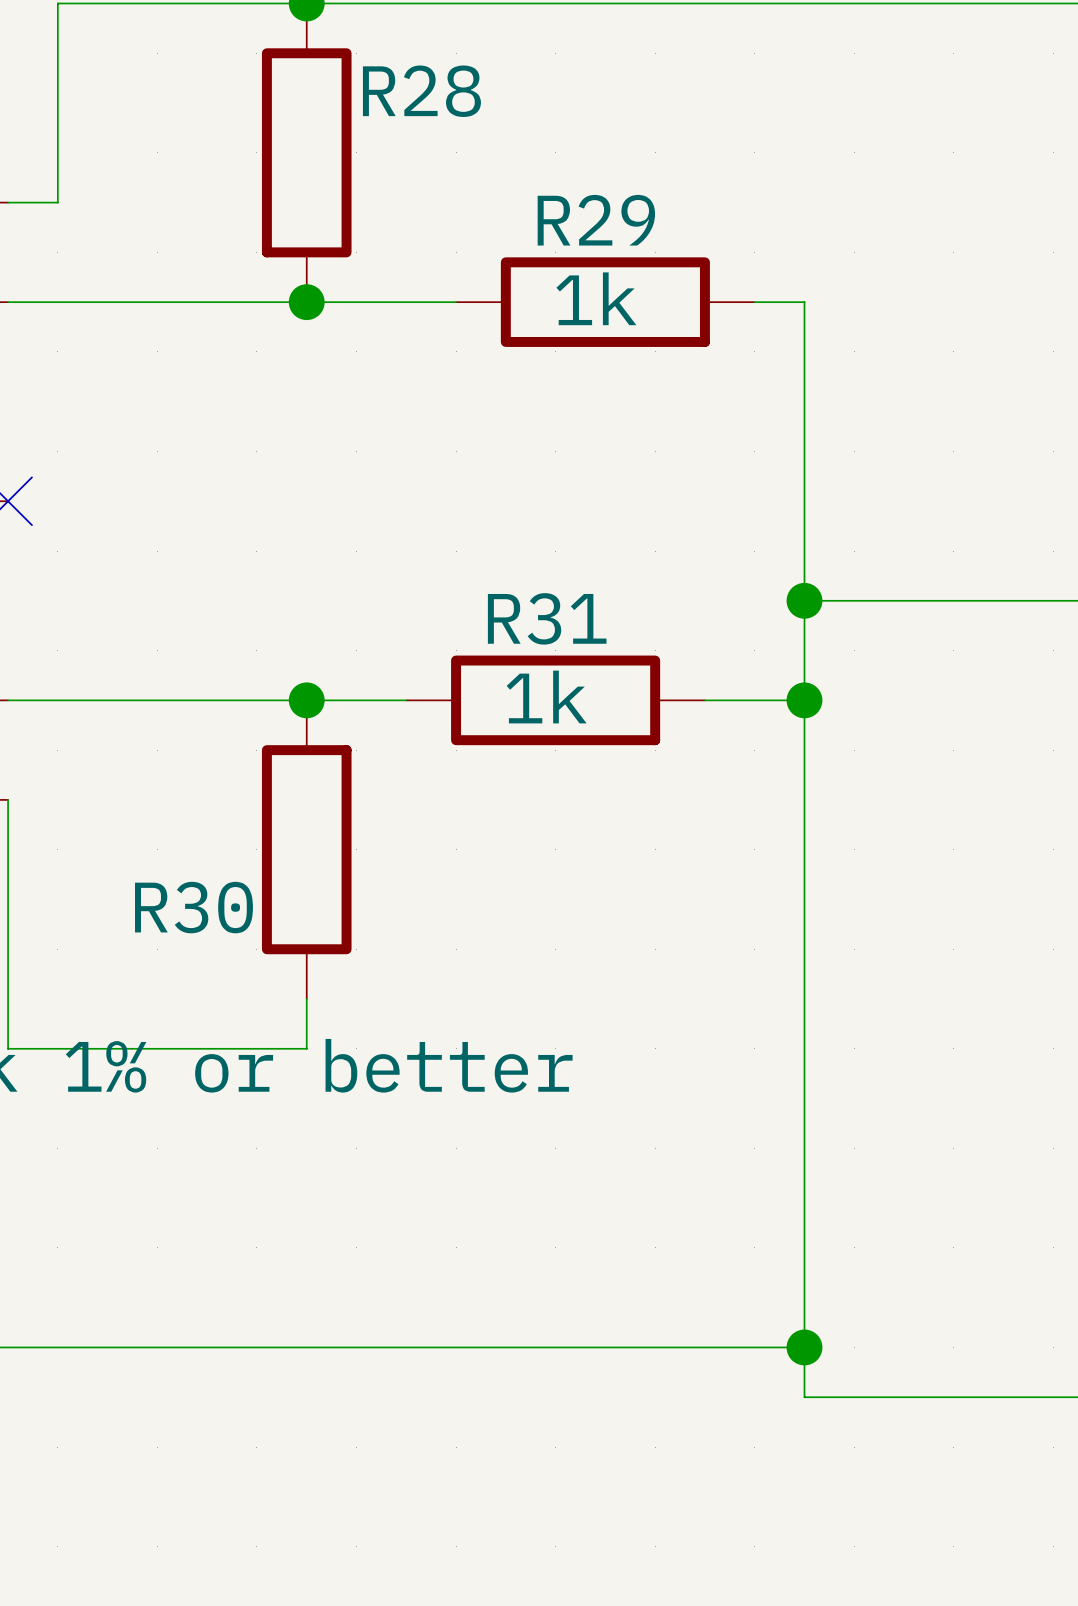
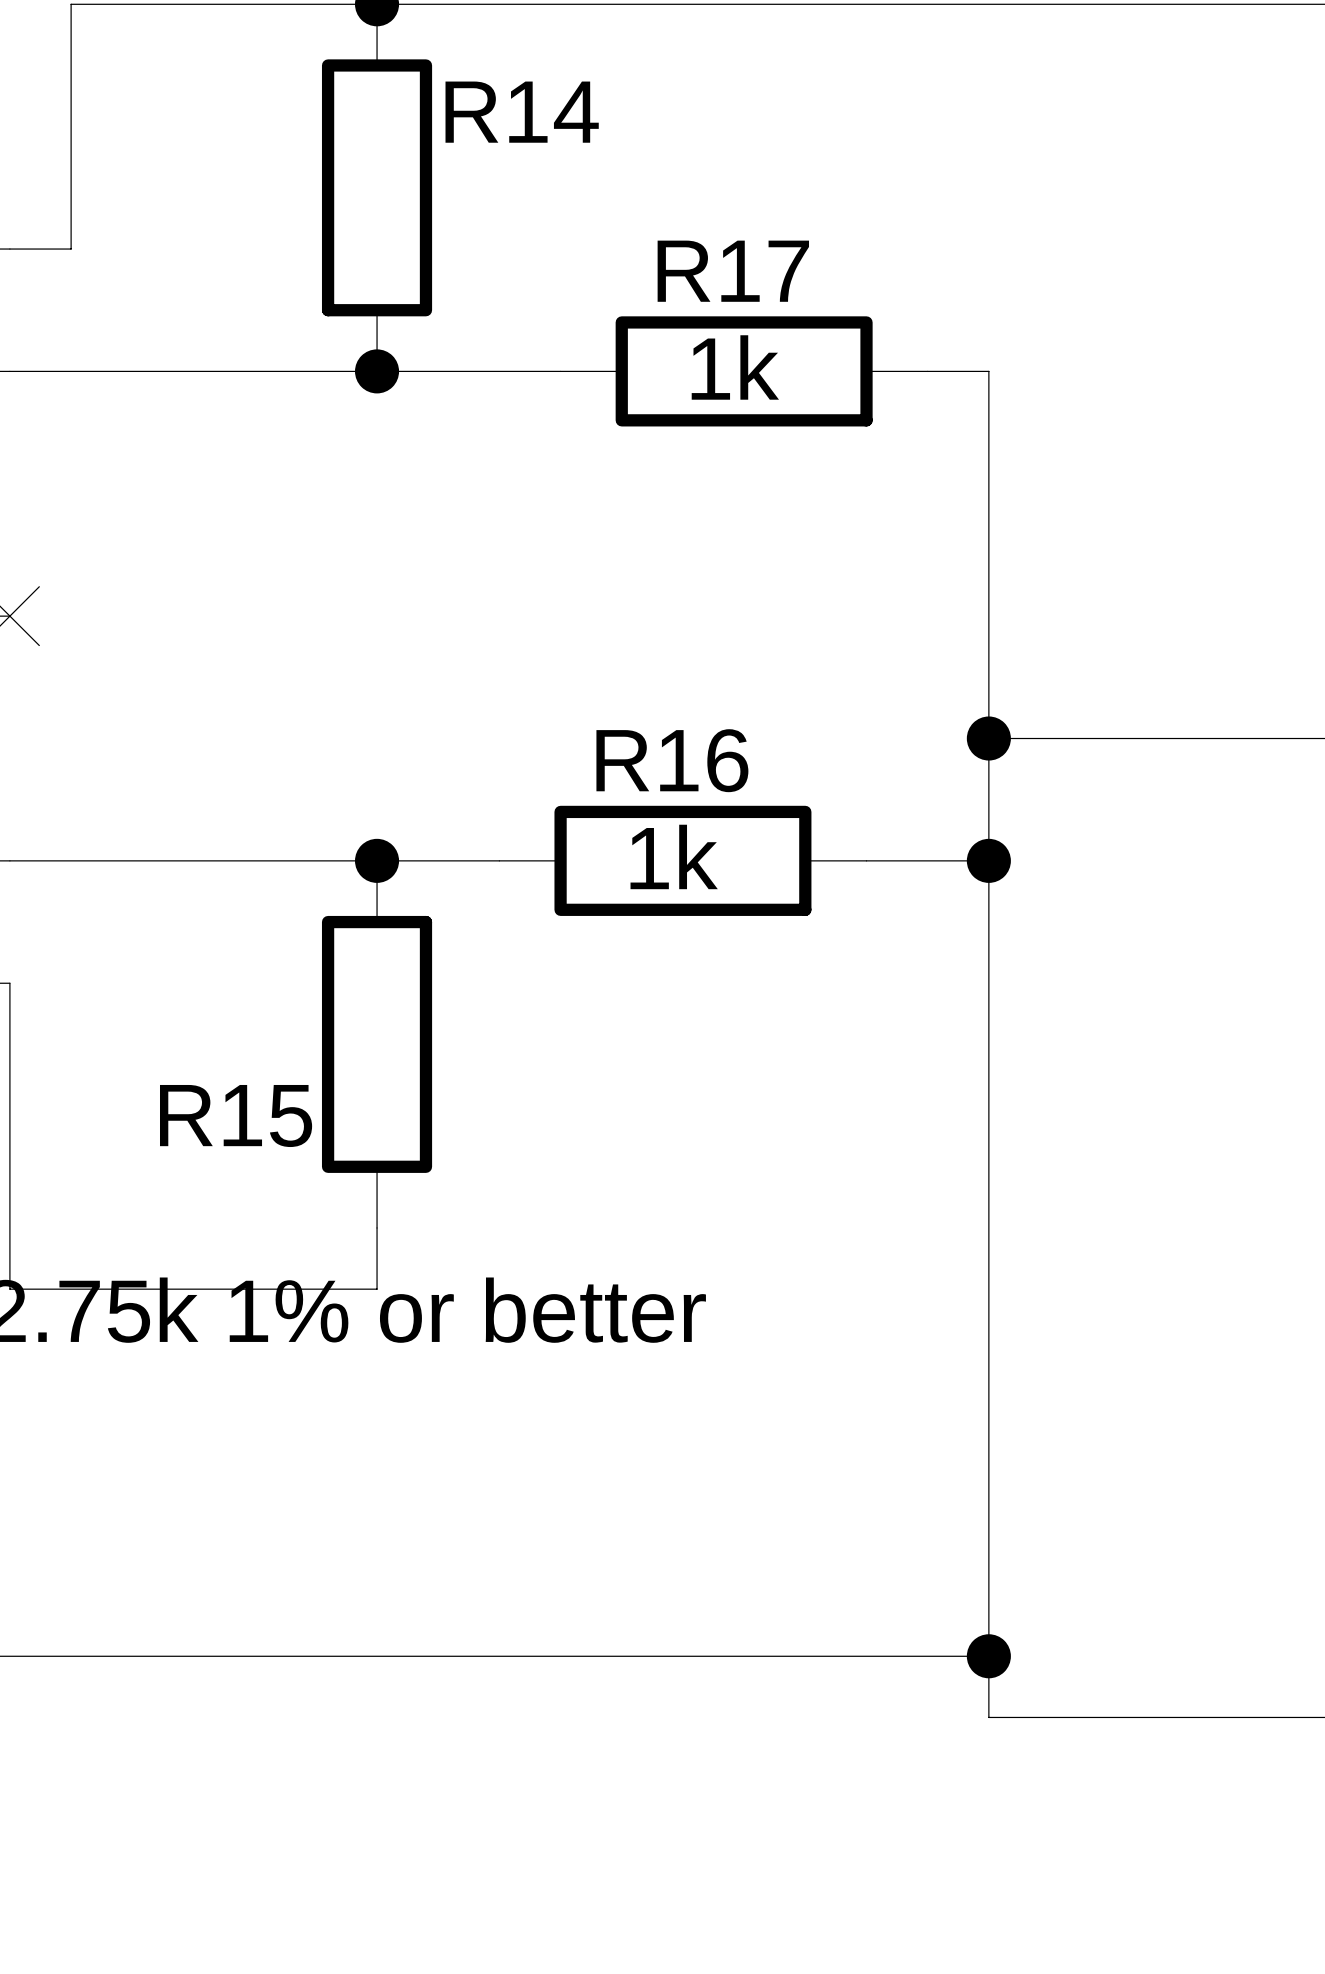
R28 name: R28 (421, 91) -> R14 (522, 112)
R29 name: R29 (596, 220) -> R17 (733, 271)
R31 name: R31 (547, 618) -> R16 (672, 760)
R30 name: R30 (193, 907) -> R15 (236, 1116)

